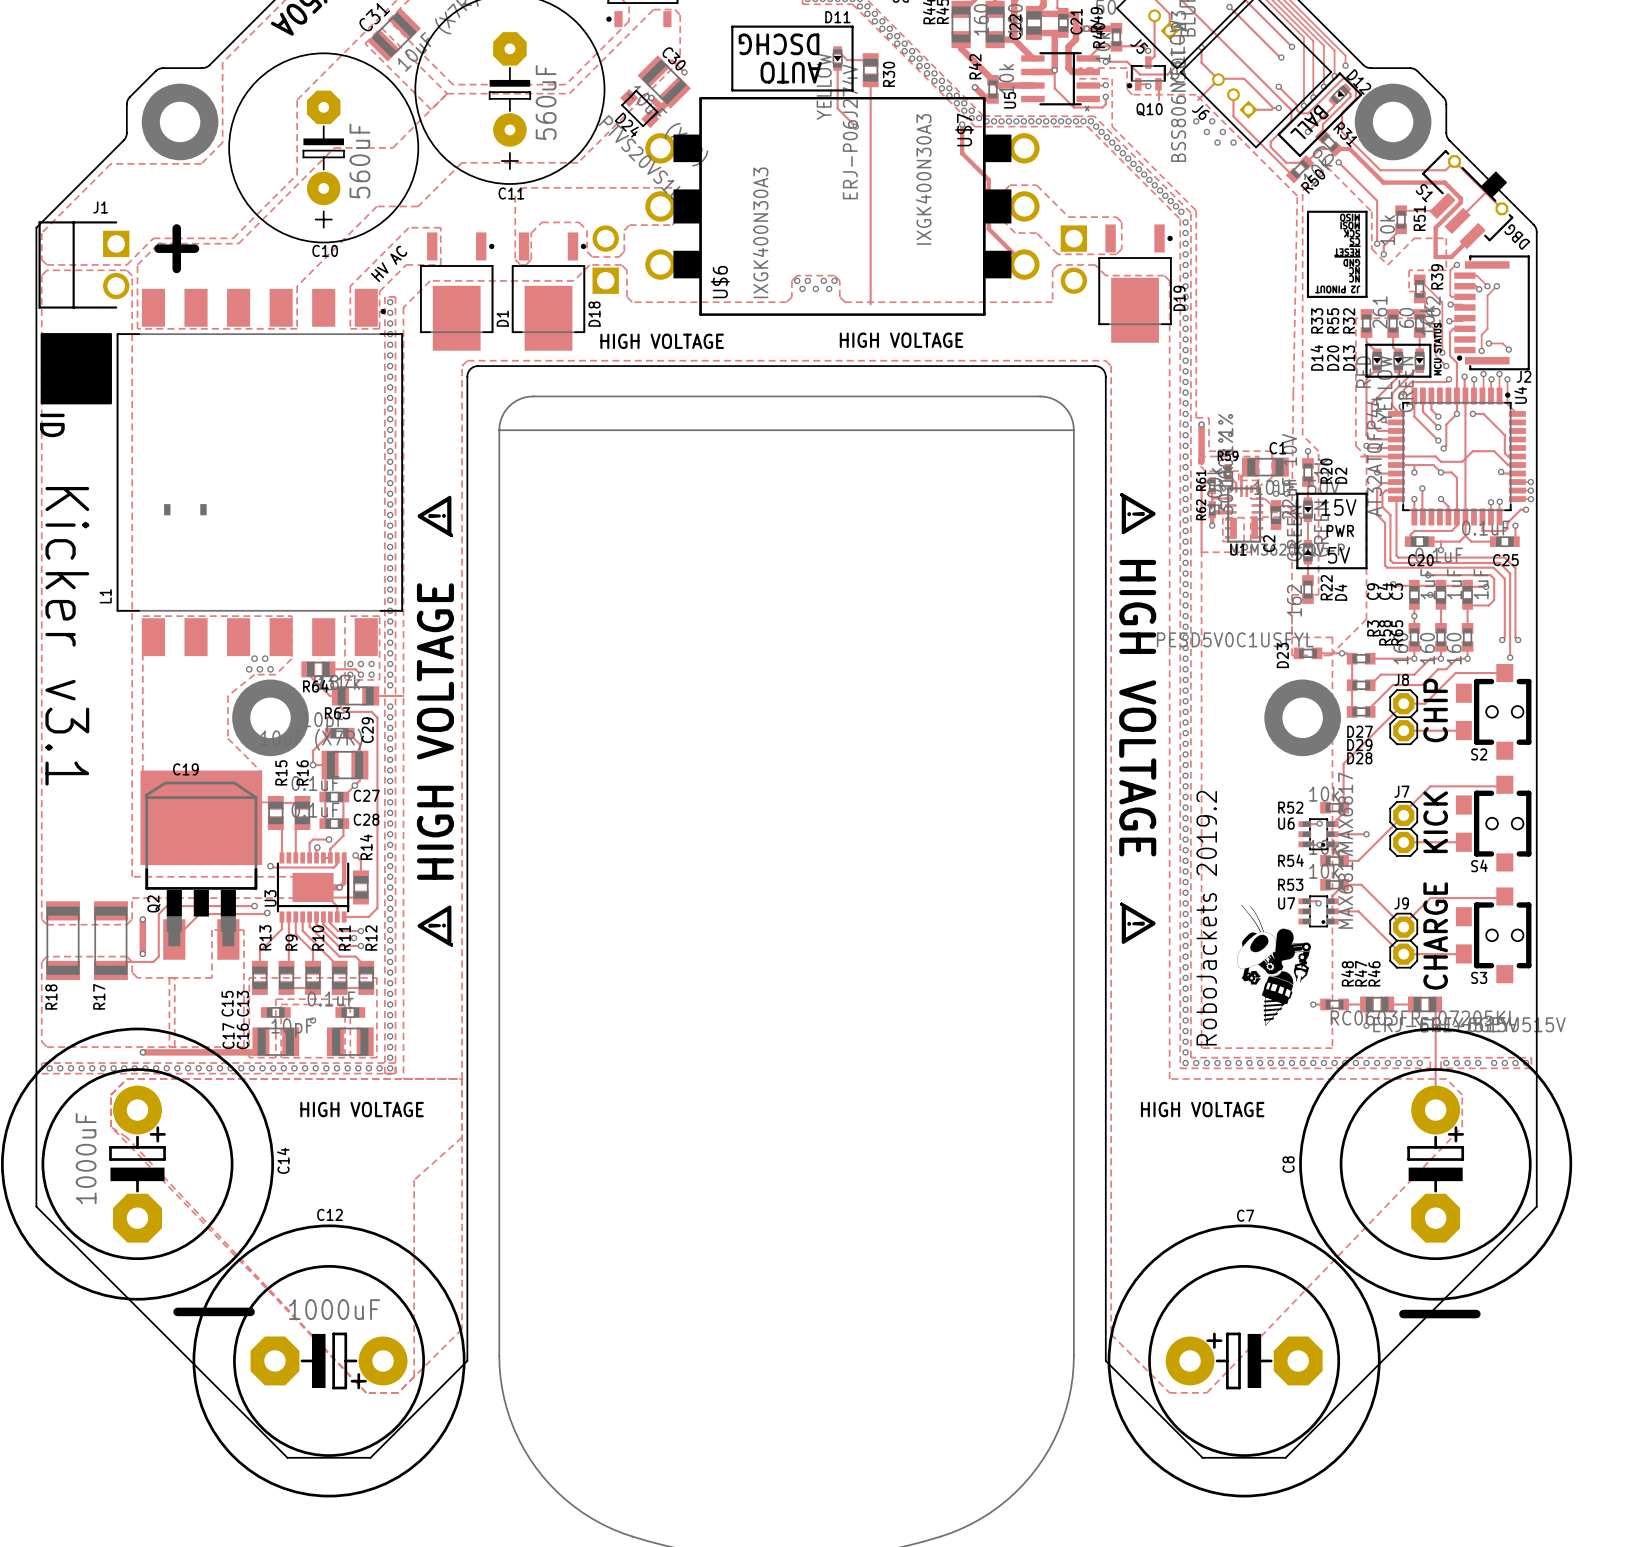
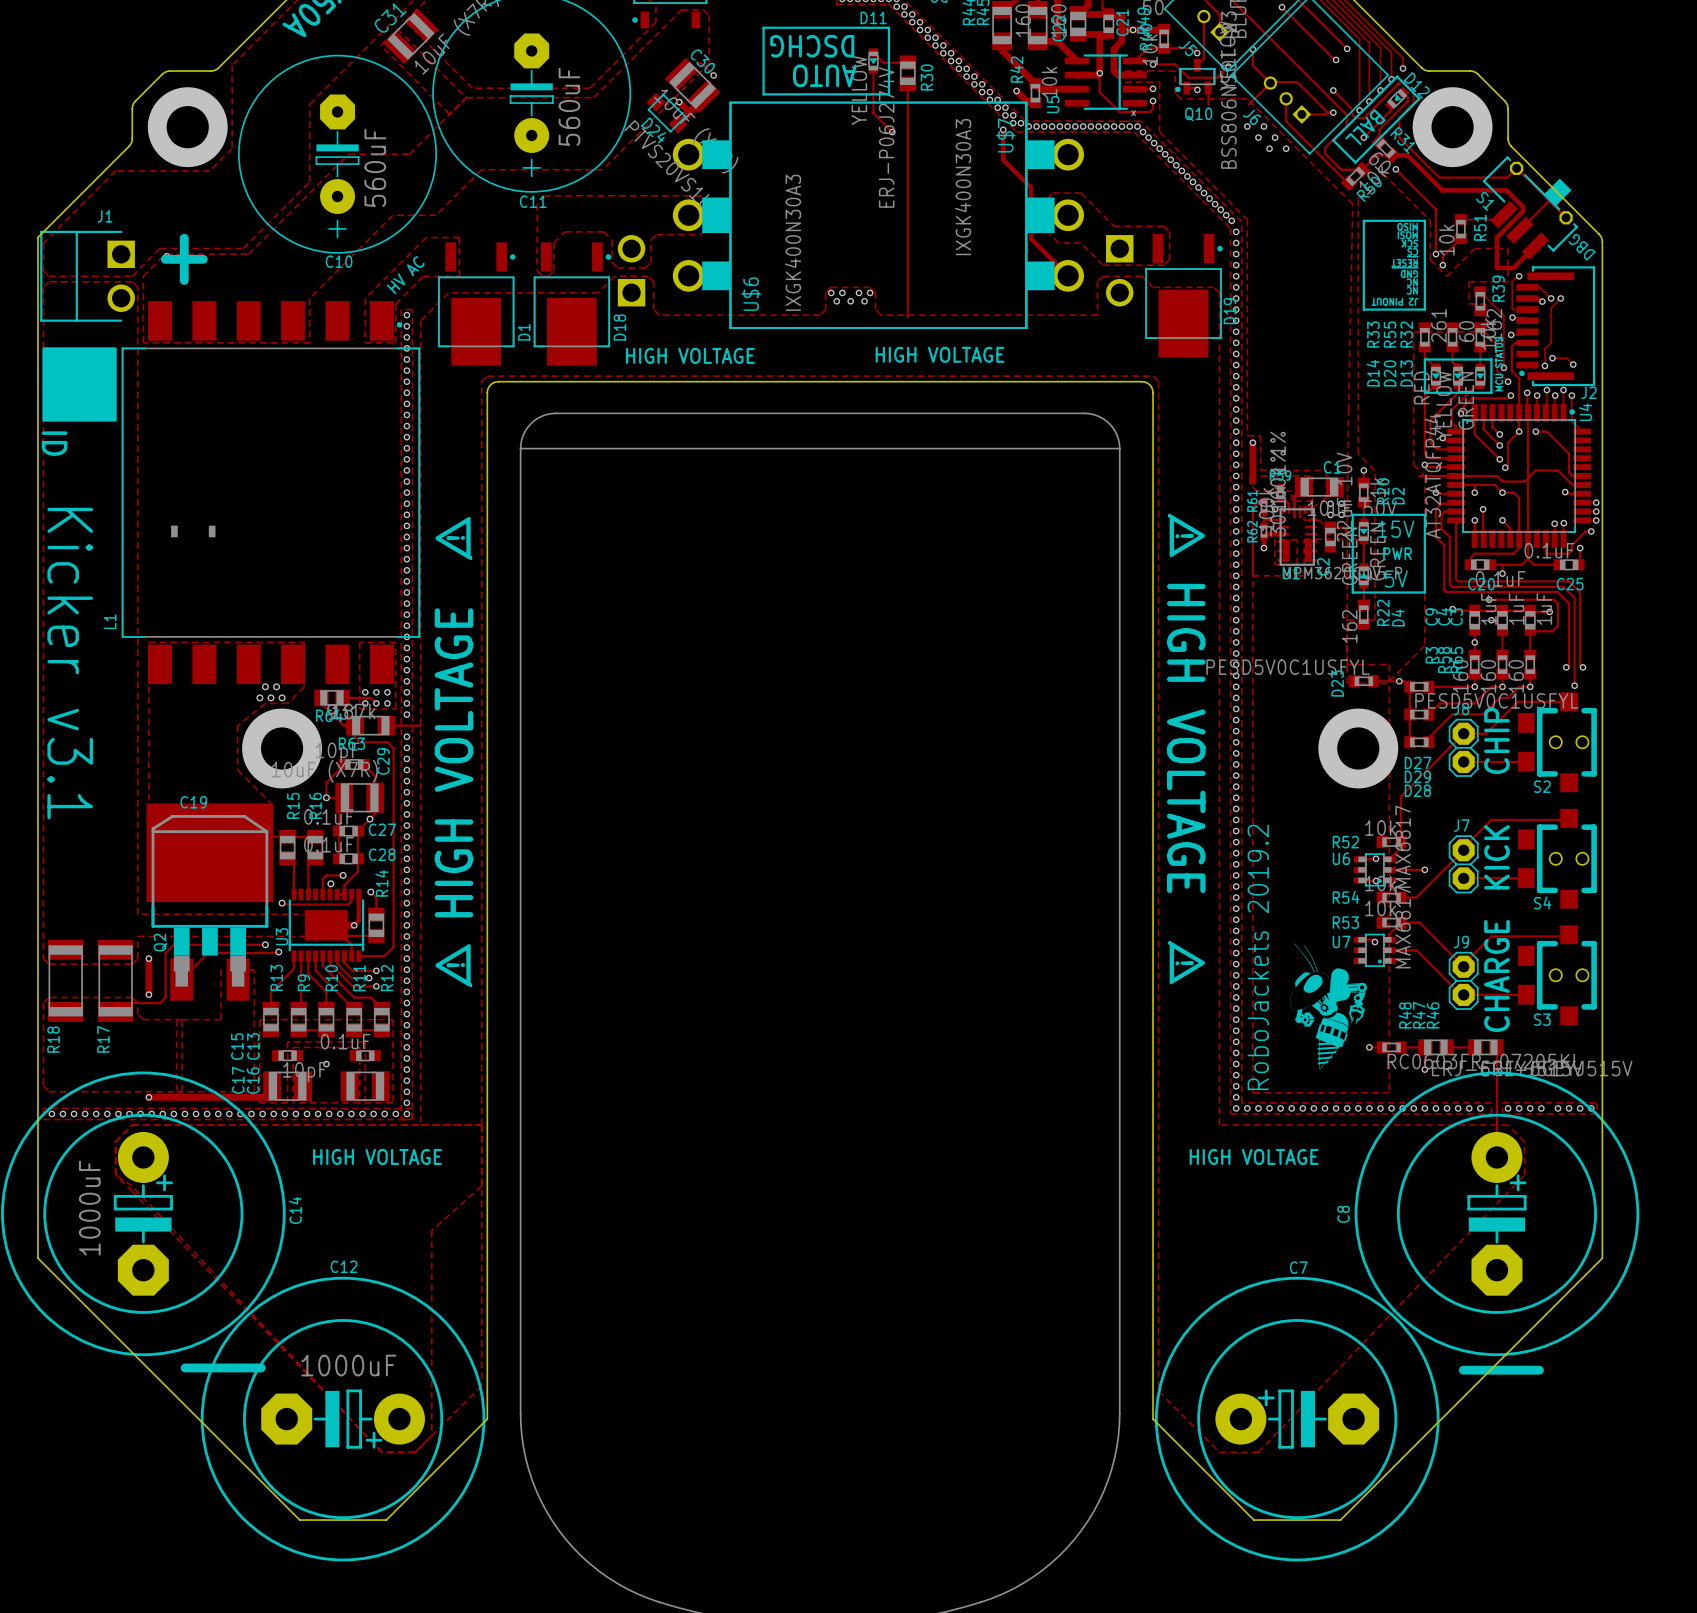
D27 value: none -> PESD5V0C1USFYL (1496, 700)

